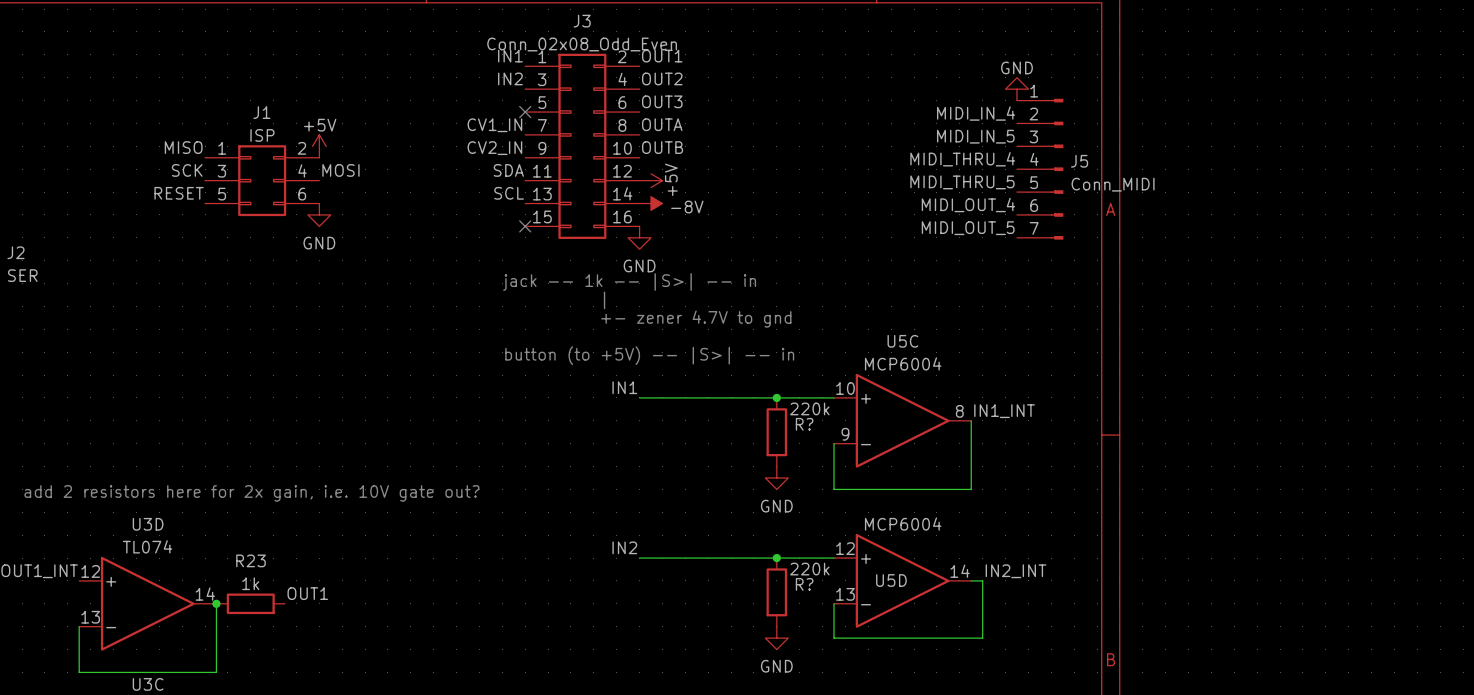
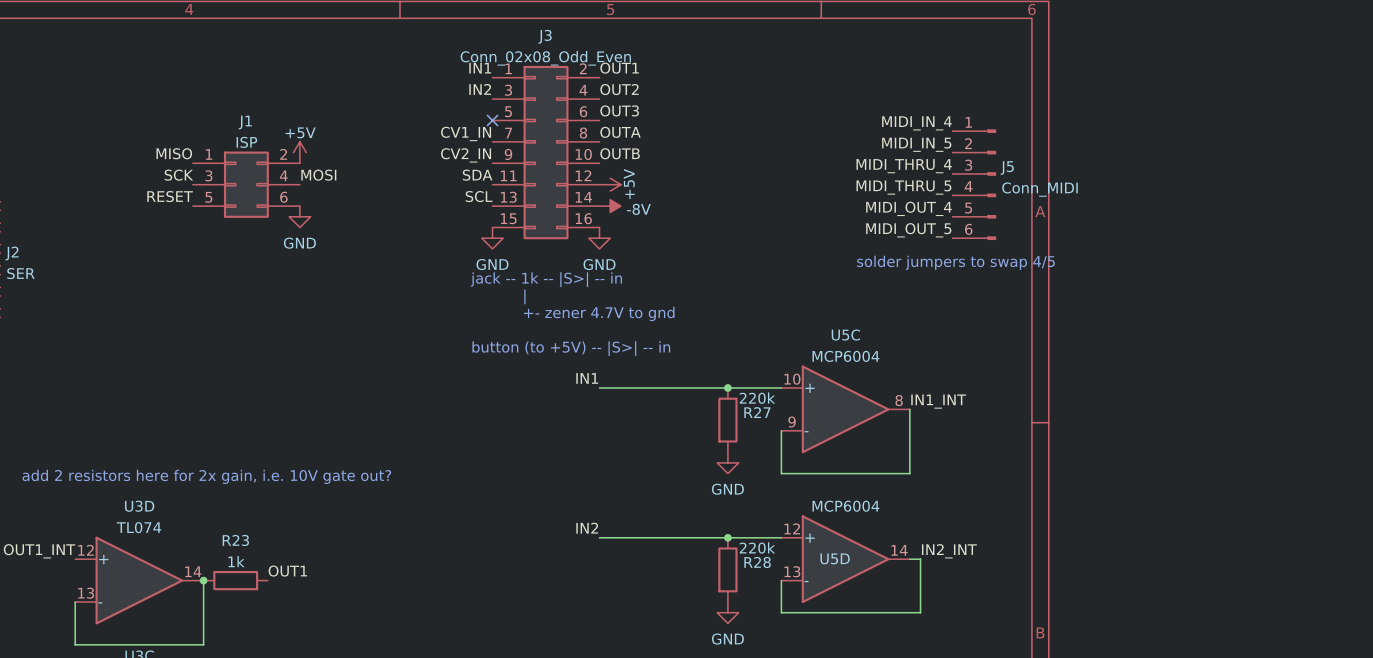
power symbol: GND (1016, 89) -> none
J5 symbol: [1016, 98, 1064, 240] -> [952, 129, 997, 240]
no-connect mark: (525, 226) -> none
power symbol: none -> GND (492, 238)
text: none -> solder jumpers to swap 4/5 (955, 262)
R? name: R? (804, 424) -> R27 (757, 412)
R? name: R? (804, 584) -> R28 (757, 562)

